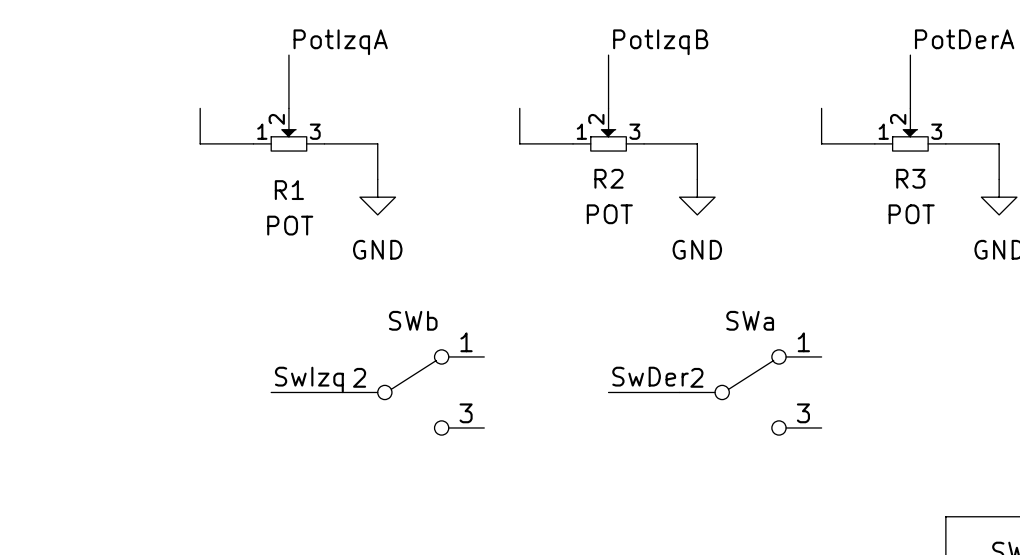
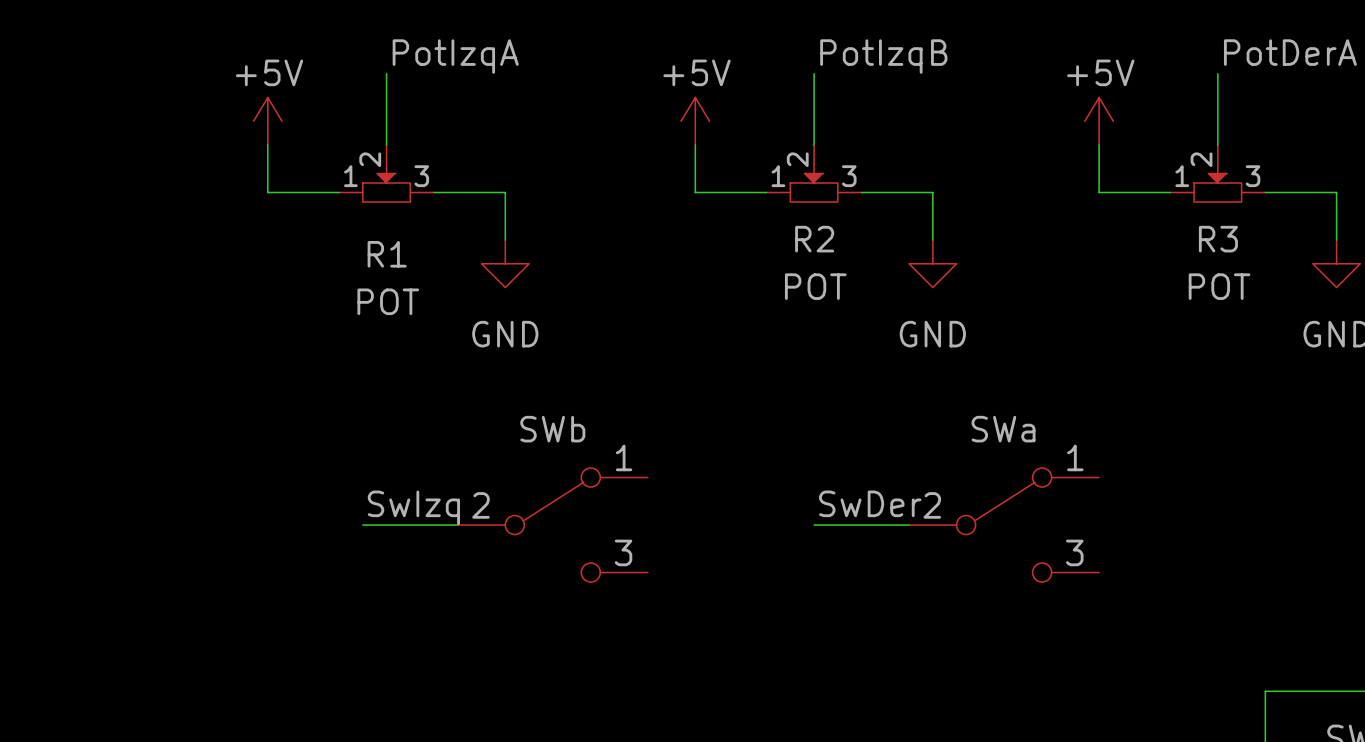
power symbol: none -> +5V (267, 121)
power symbol: none -> +5V (695, 121)
power symbol: none -> +5V (1099, 121)

